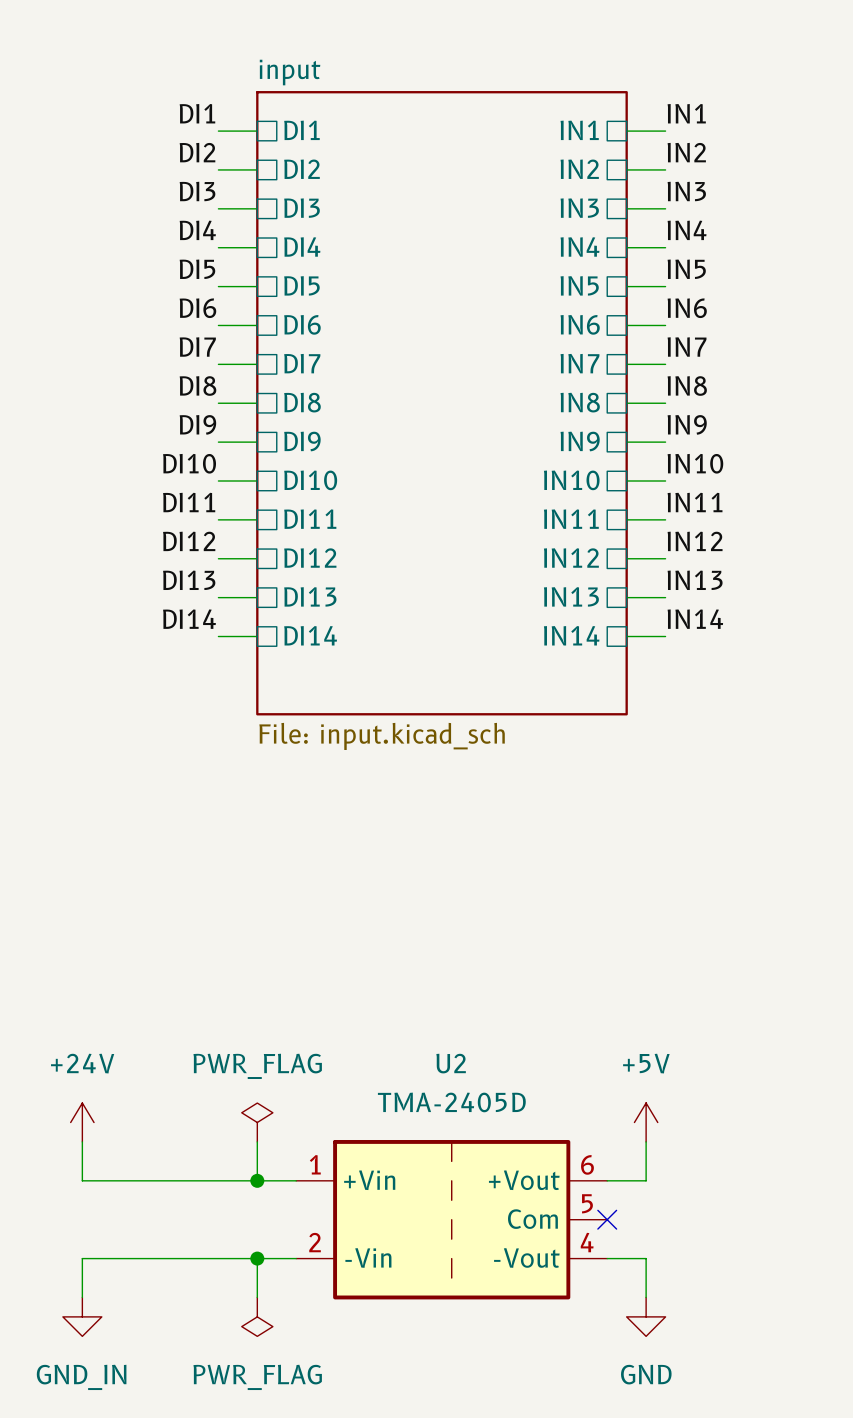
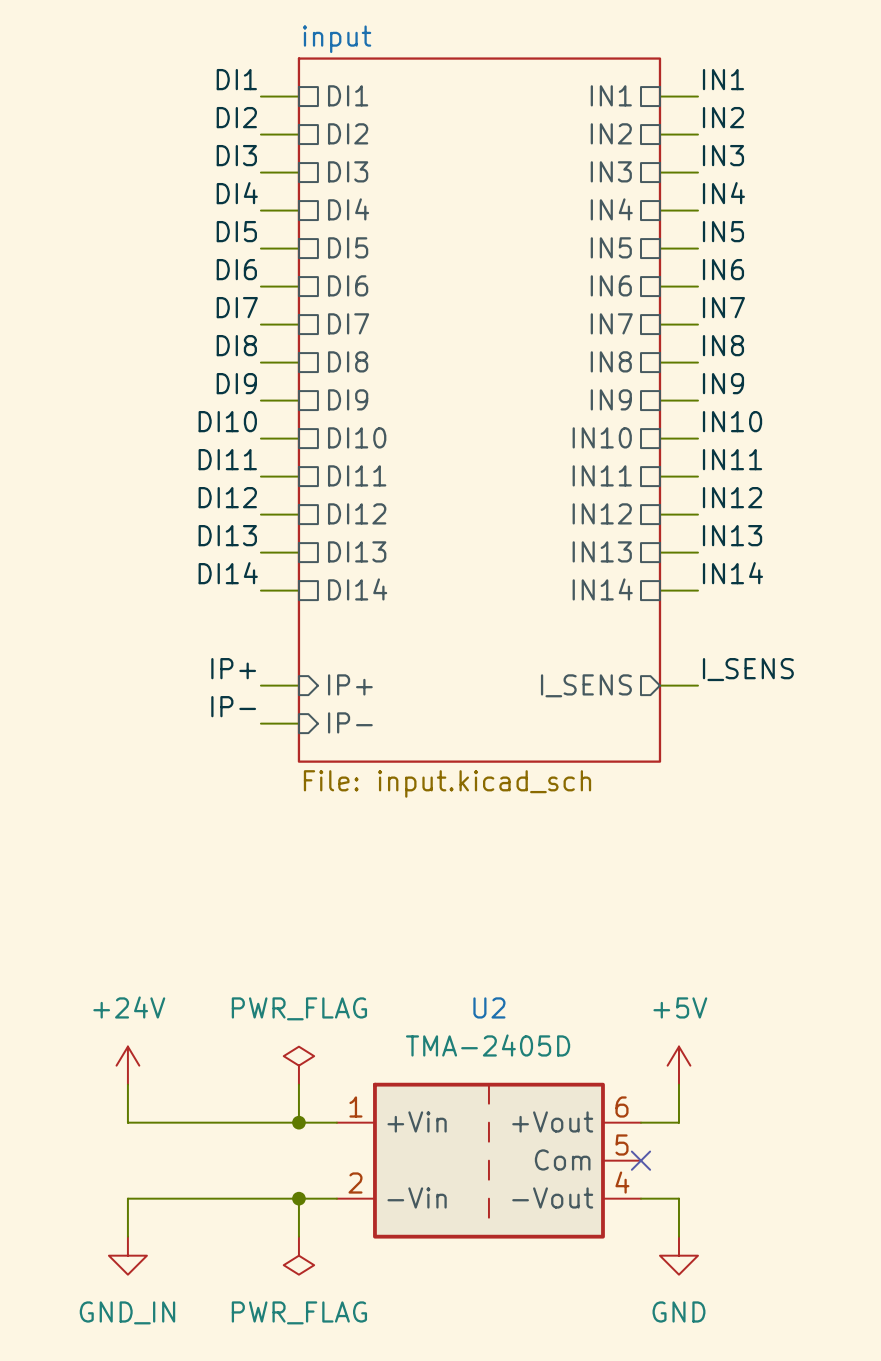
sheet input: File: input.kicad_sch (441, 403) -> none
sheet input: none -> File: input.kicad_sch (479, 410)
label: none -> IP+ (233, 668)
label: none -> I_SENS (748, 669)
sheet pin: none -> IP+ (350, 684)
wire: none -> (260, 685) (298, 685)
wire: none -> (659, 685) (697, 685)
sheet pin: none -> I_SENS (586, 685)
label: none -> IP- (233, 706)
sheet pin: none -> IP- (350, 722)
wire: none -> (260, 723) (298, 723)

